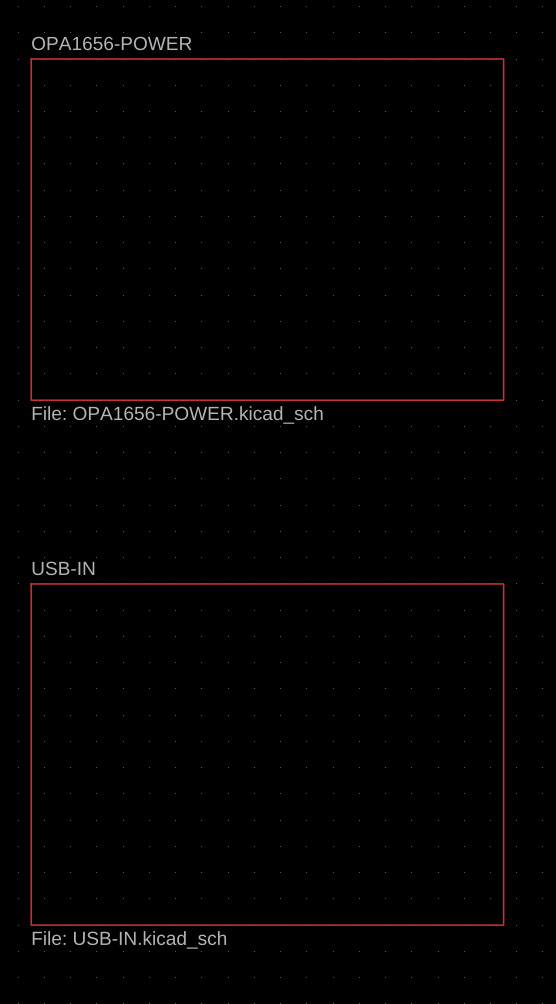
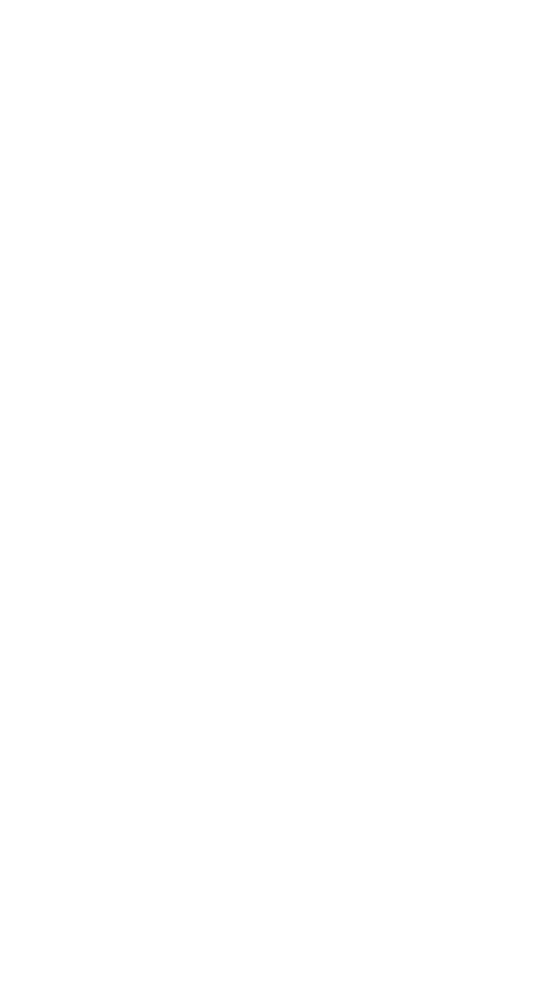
sheet OPA1656-POWER: File: OPA1656-POWER.kicad_sch (267, 229) -> none
sheet USB-IN: File: USB-IN.kicad_sch (267, 754) -> none

